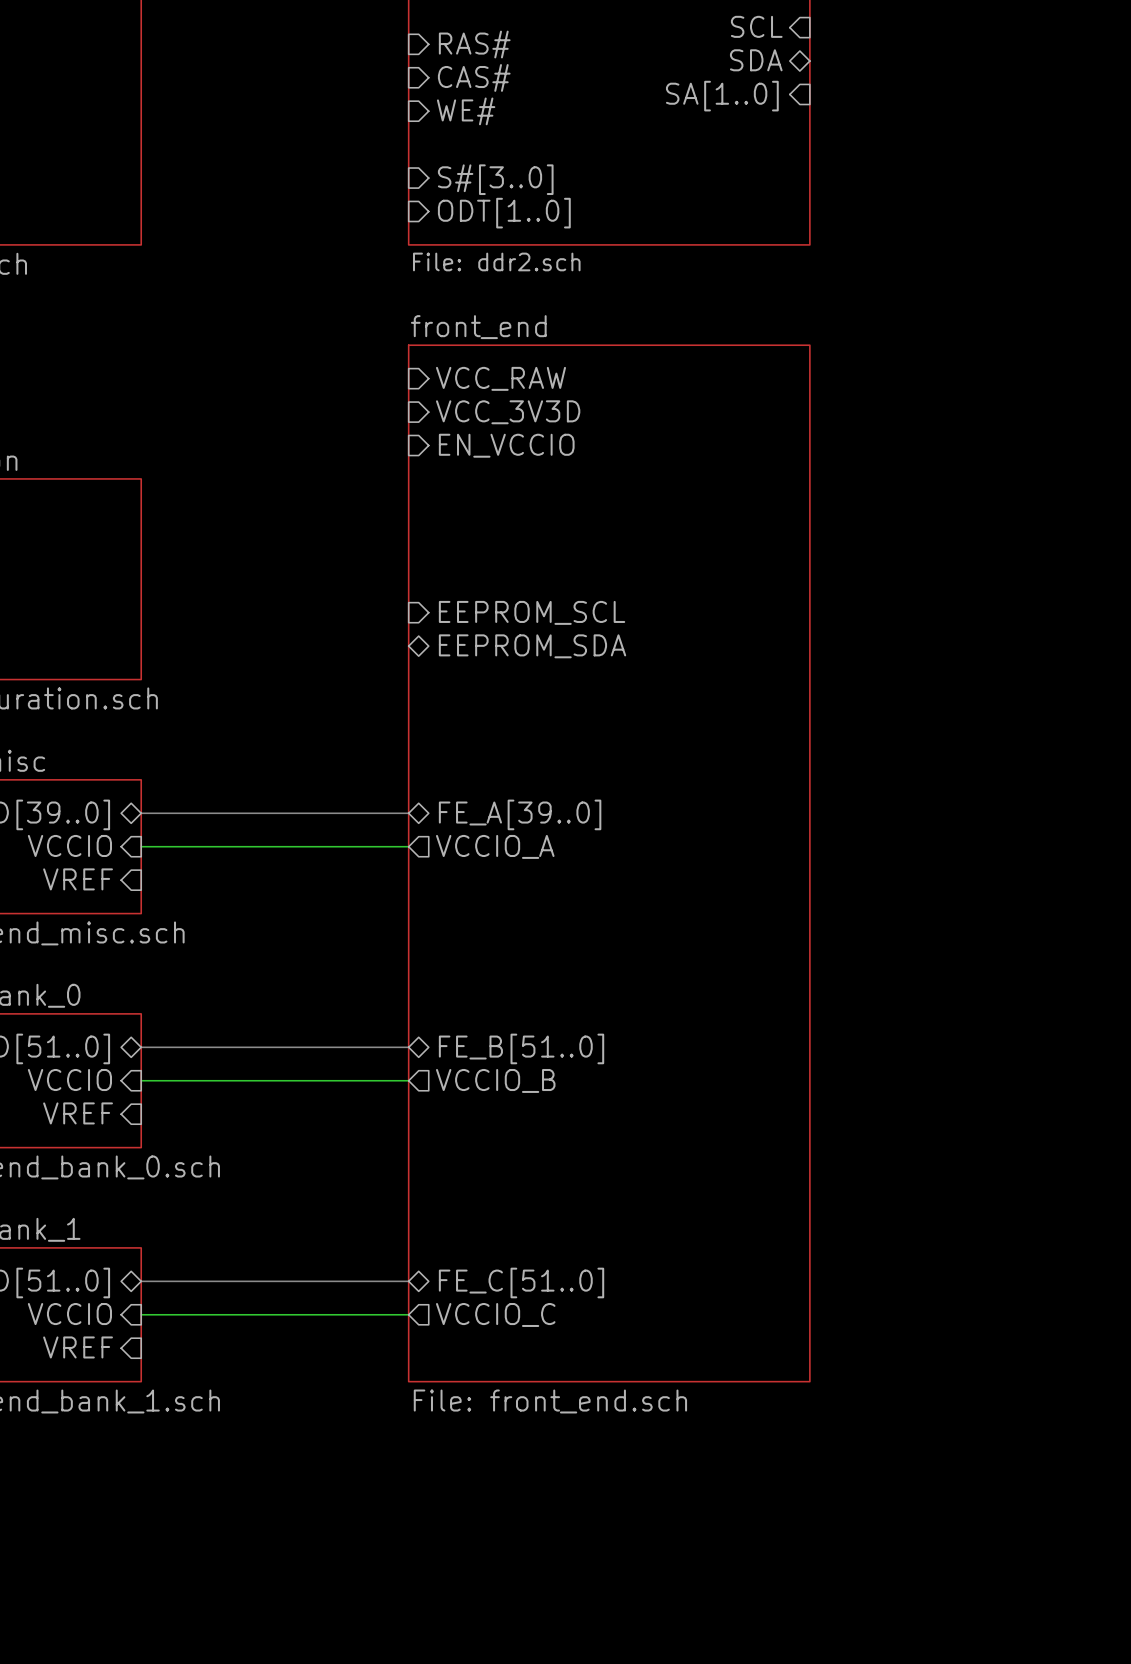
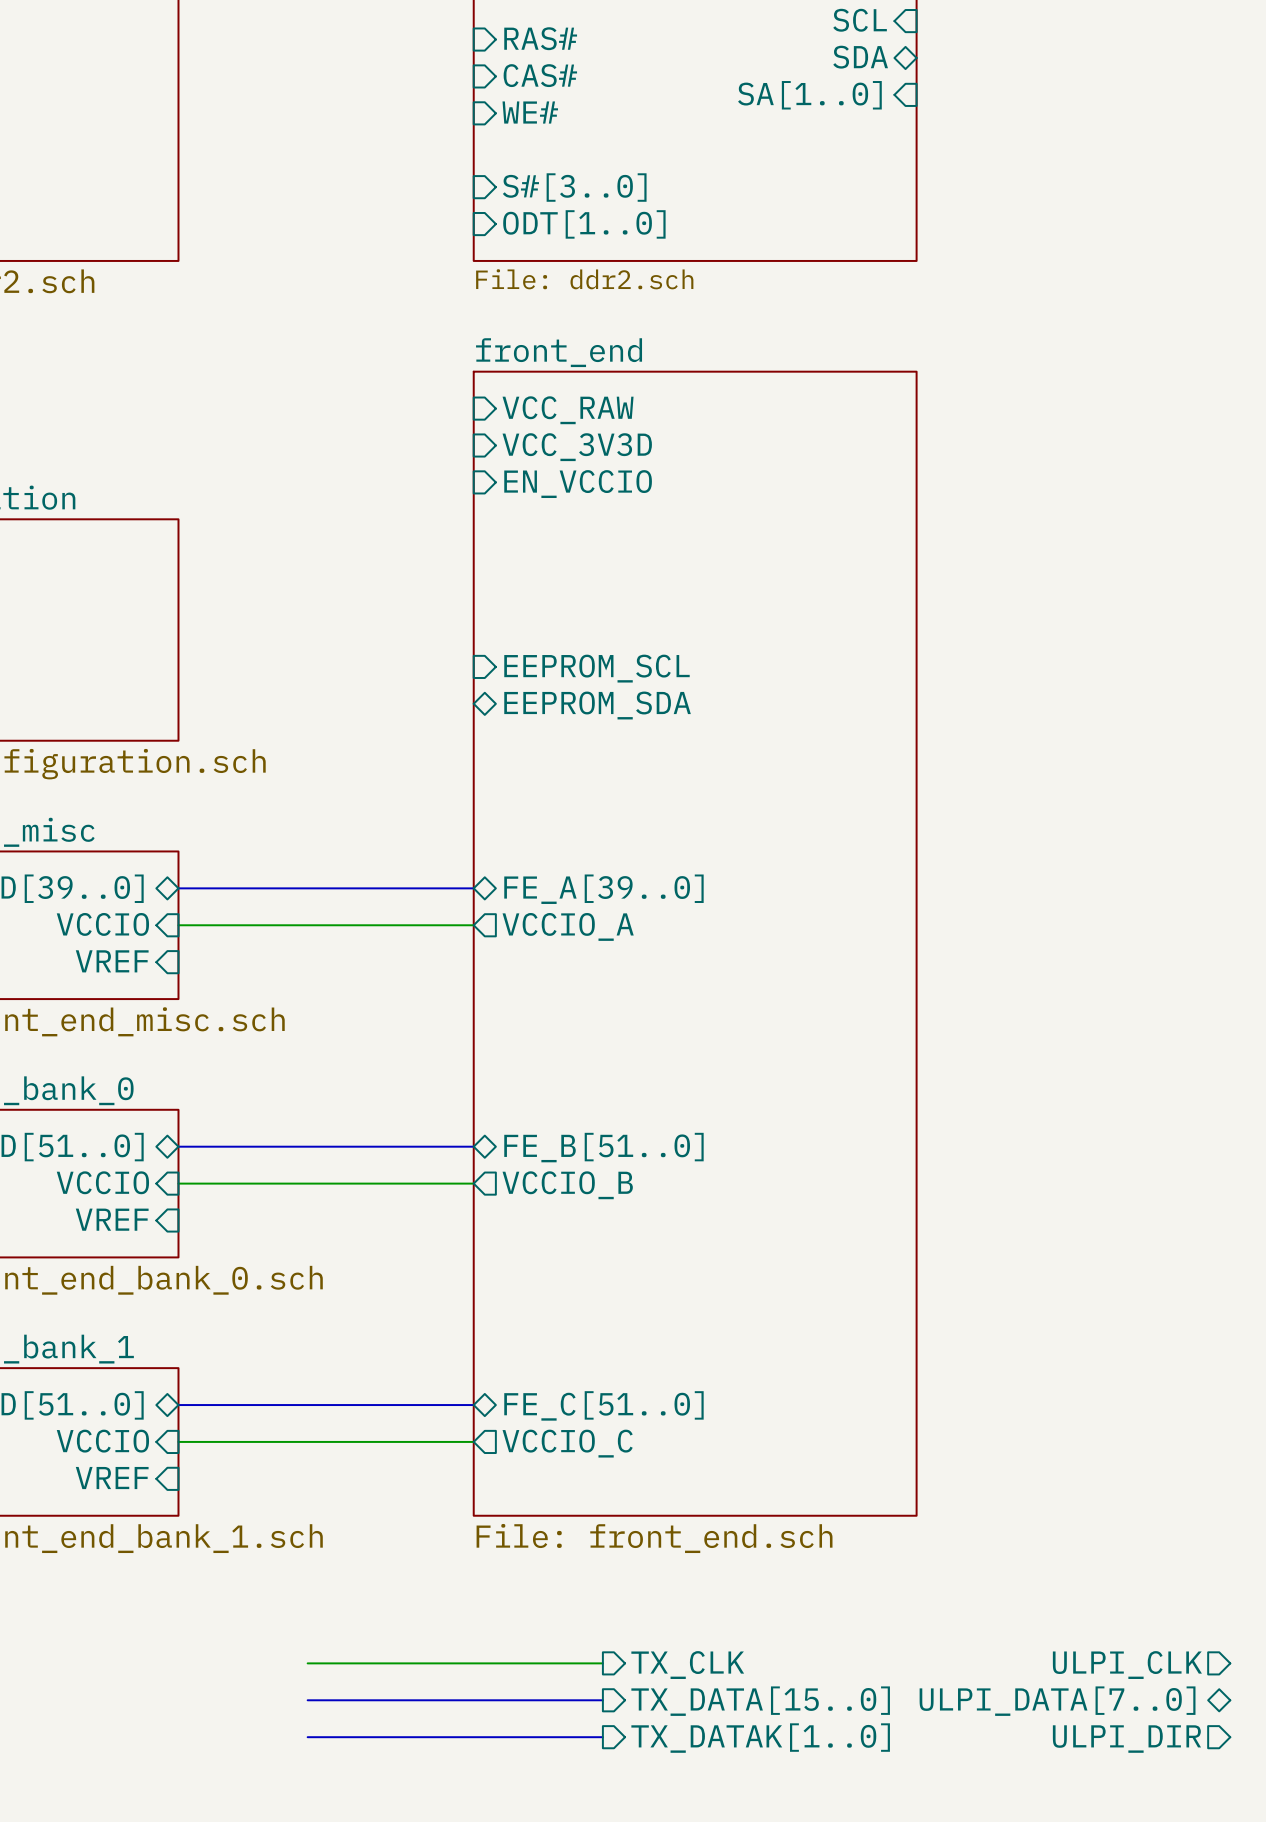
wire: none -> (307, 1663) (602, 1663)
sheet pin: none -> TX_CLK (687, 1665)
sheet pin: none -> ULPI_CLK (1127, 1665)
bus: none -> (307, 1700) (602, 1700)
sheet pin: none -> TX_DATA[15..0] (760, 1701)
sheet pin: none -> ULPI_DATA[7..0] (1057, 1701)
bus: none -> (307, 1737) (602, 1737)
sheet pin: none -> ULPI_DIR (1126, 1739)
sheet pin: none -> TX_DATAK[1..0] (760, 1738)

